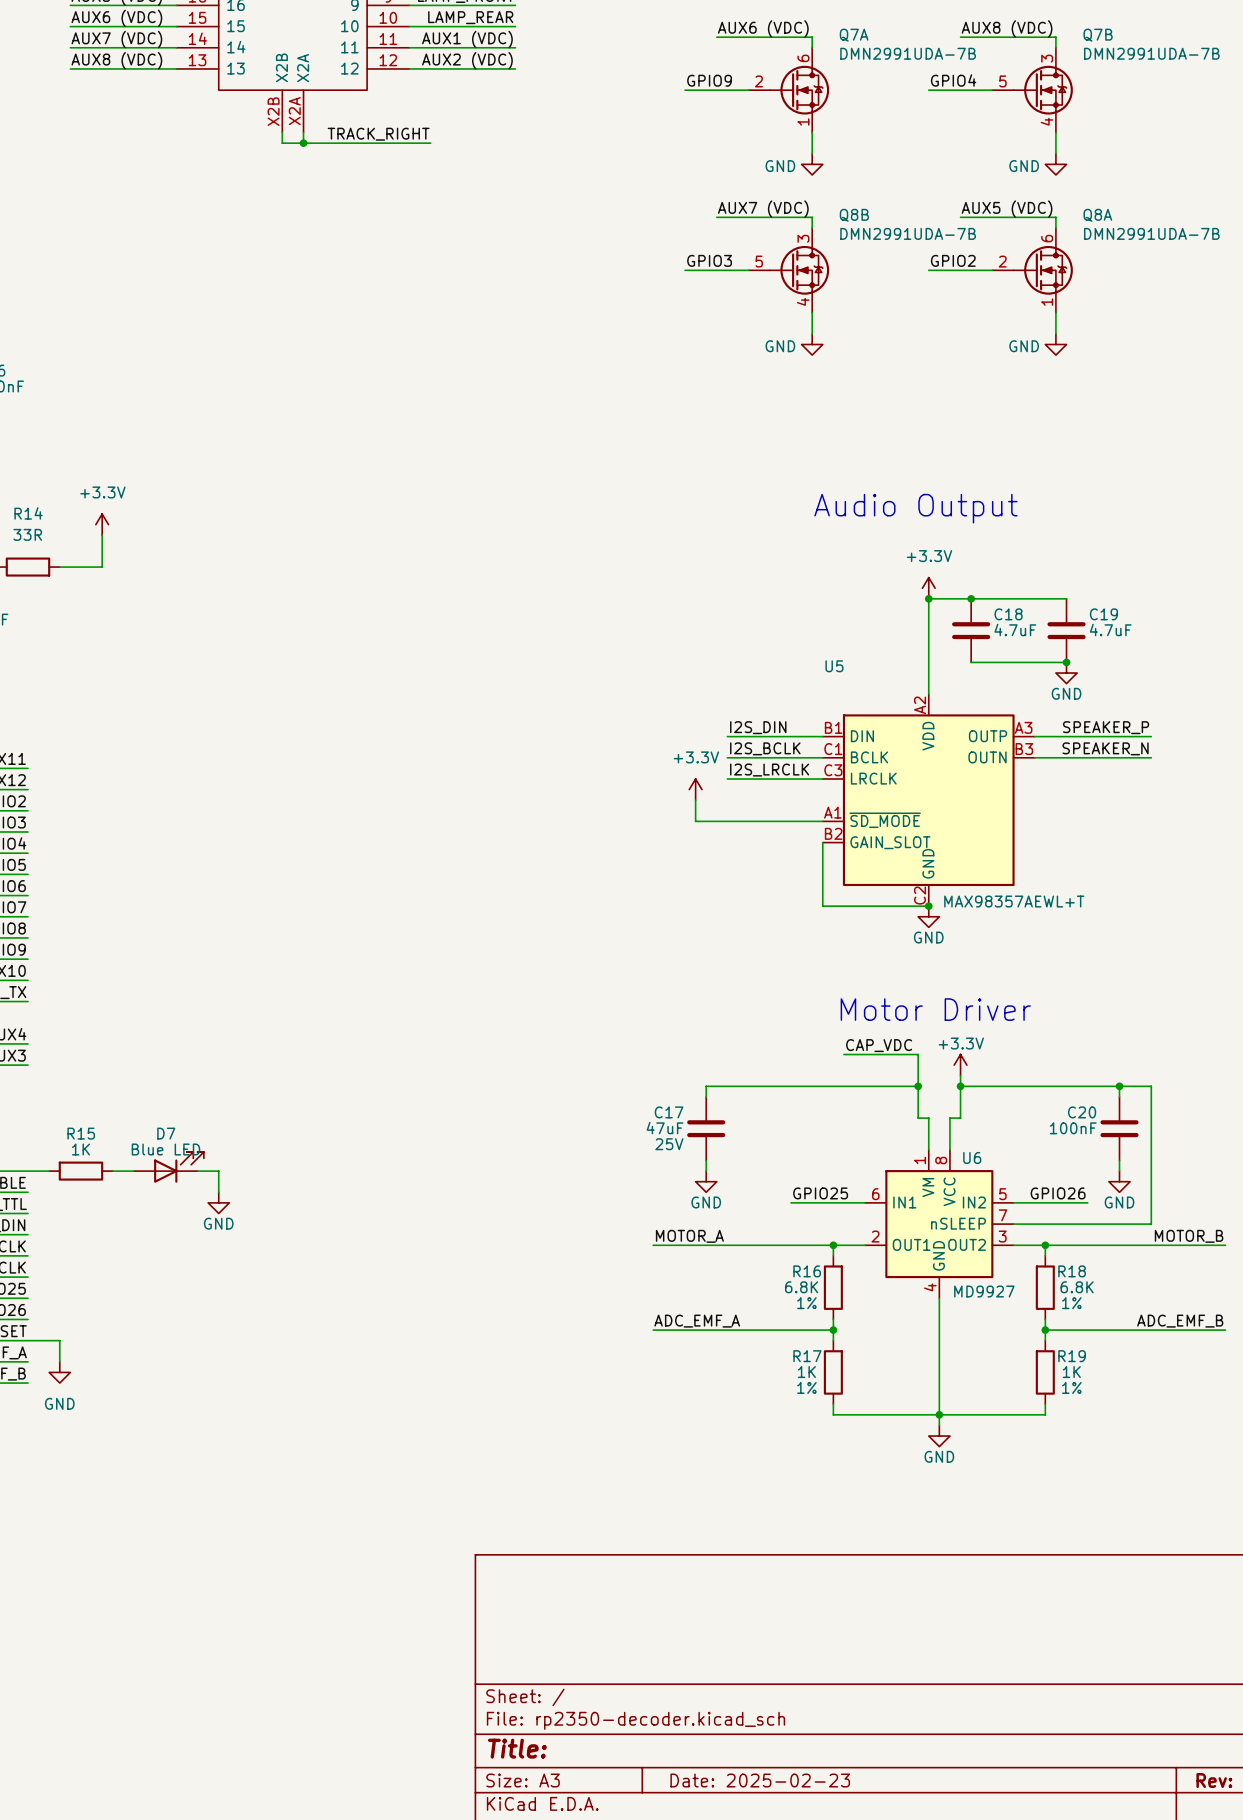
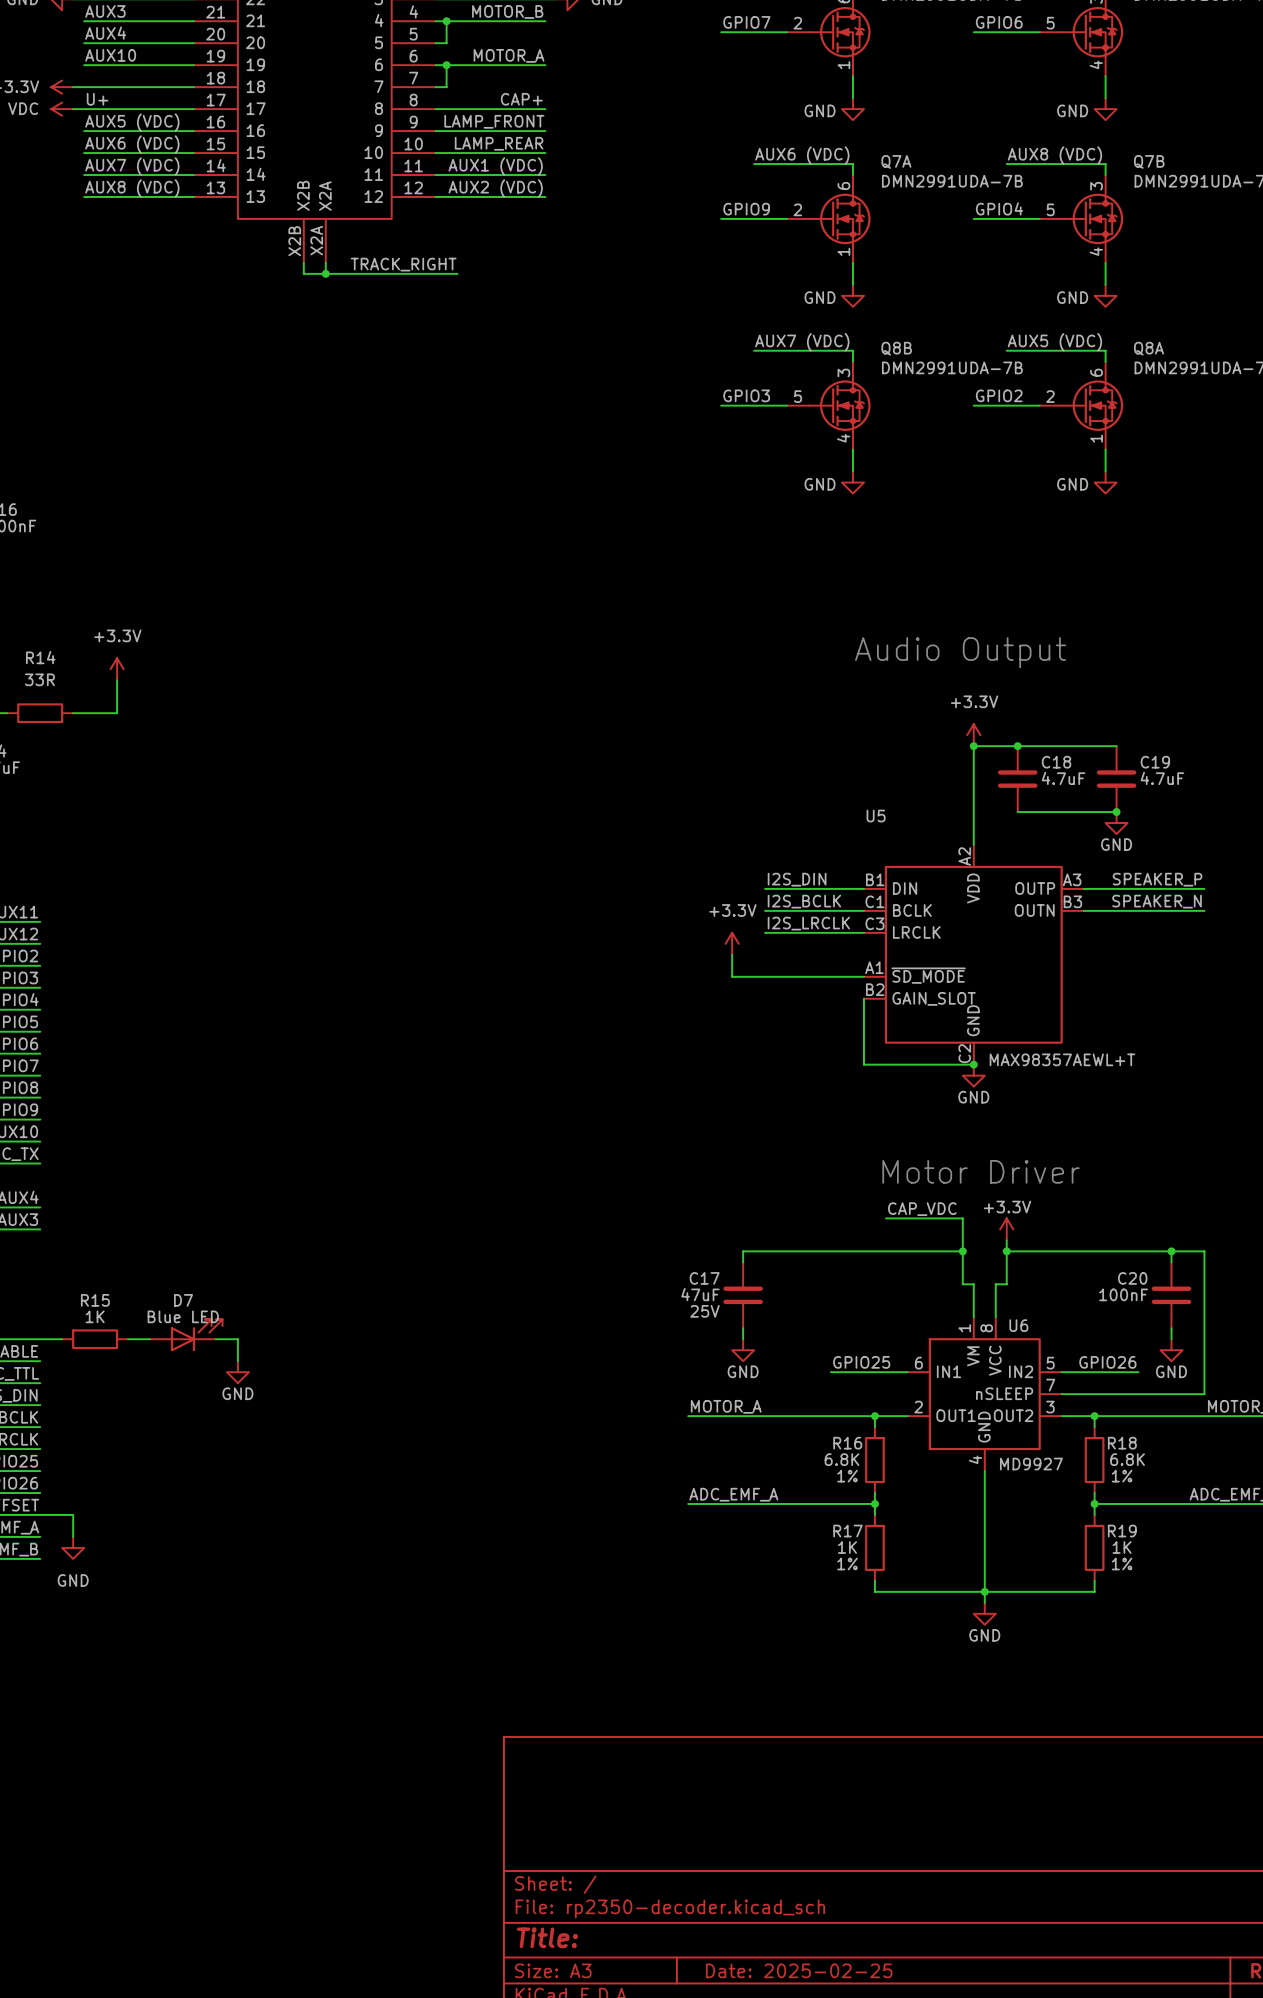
title block: Date: 2025-02-23 (760, 1780) -> Date: 2025-02-25 (799, 1970)

